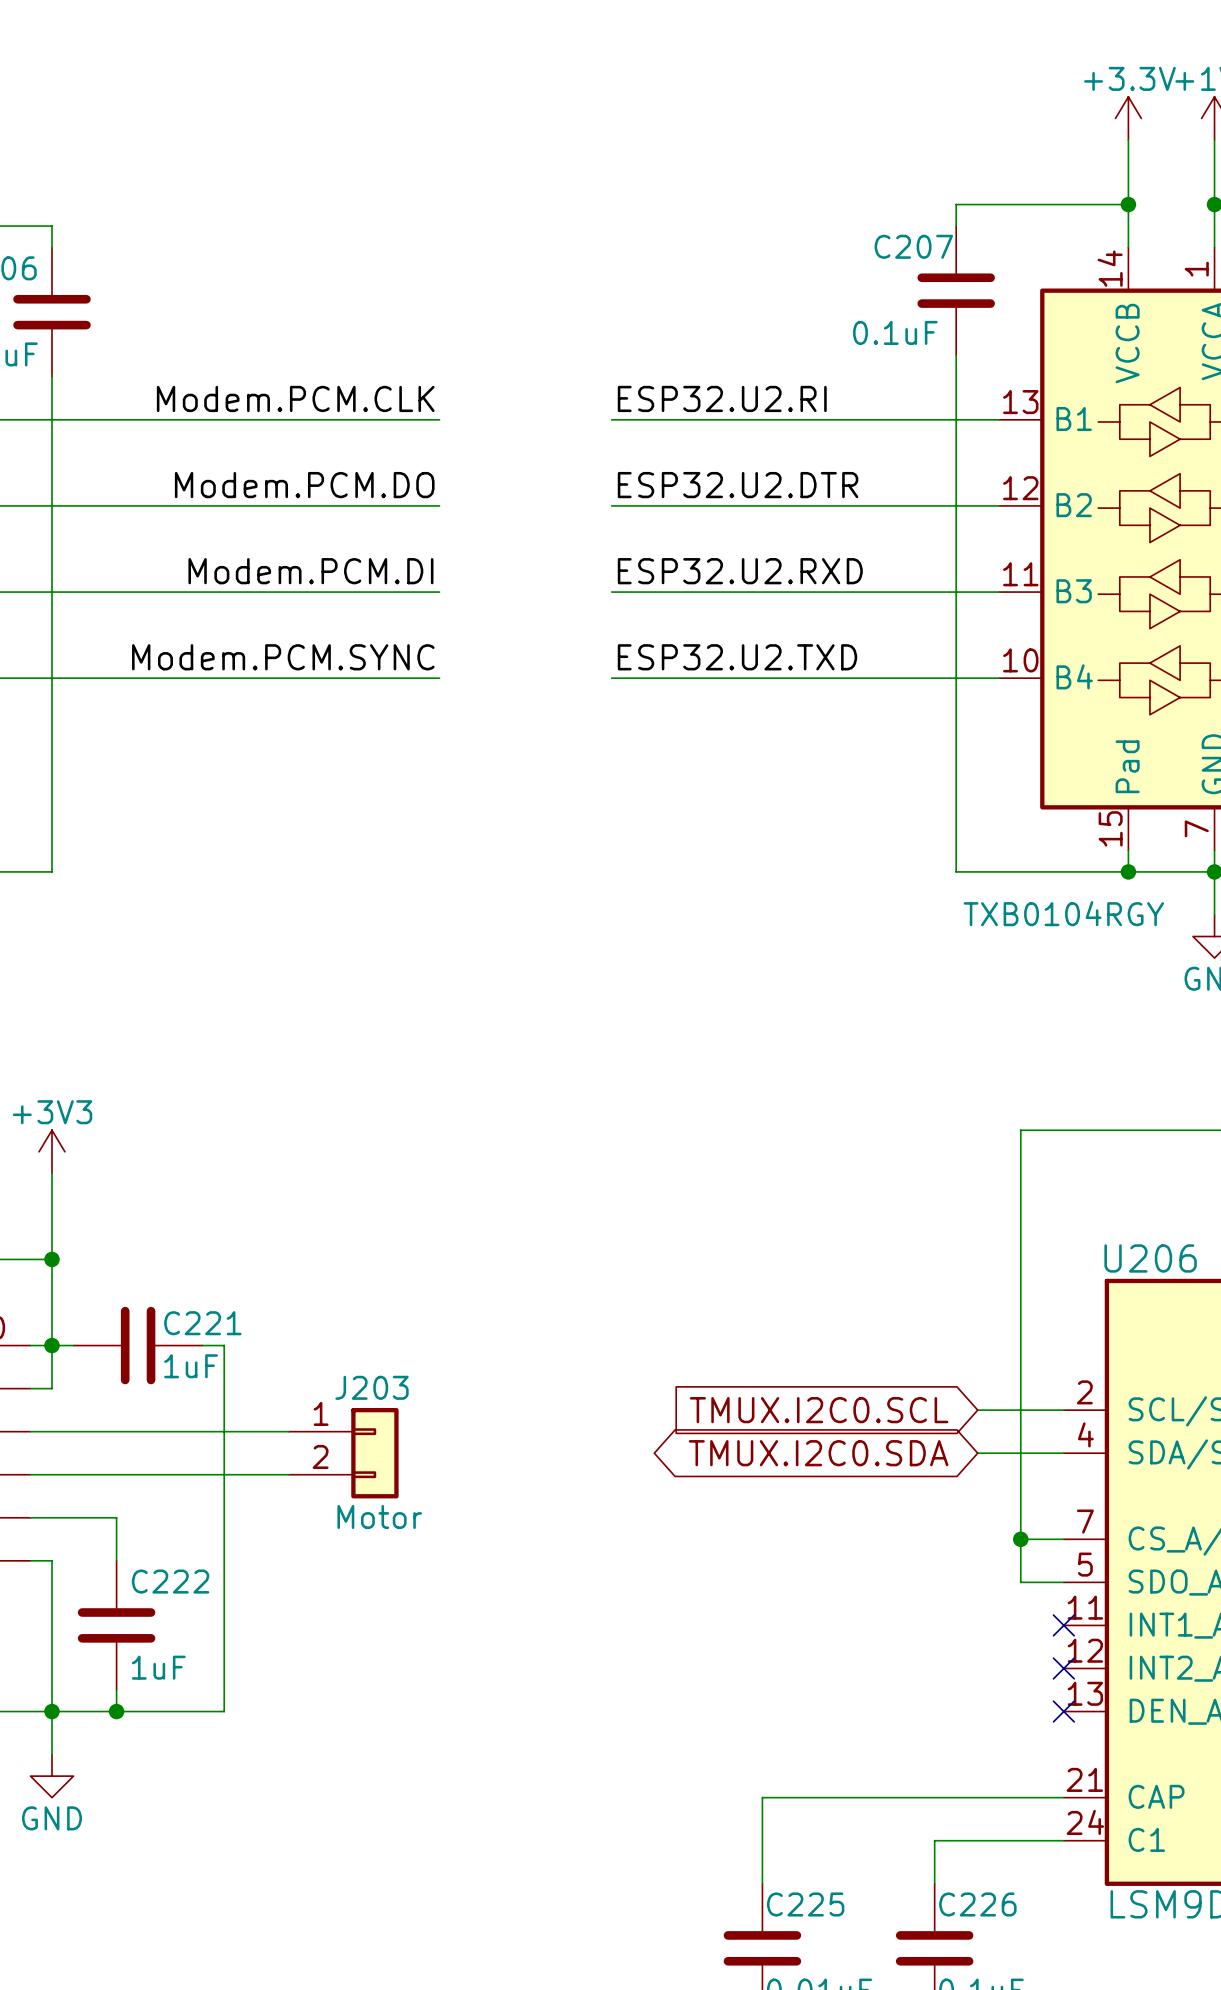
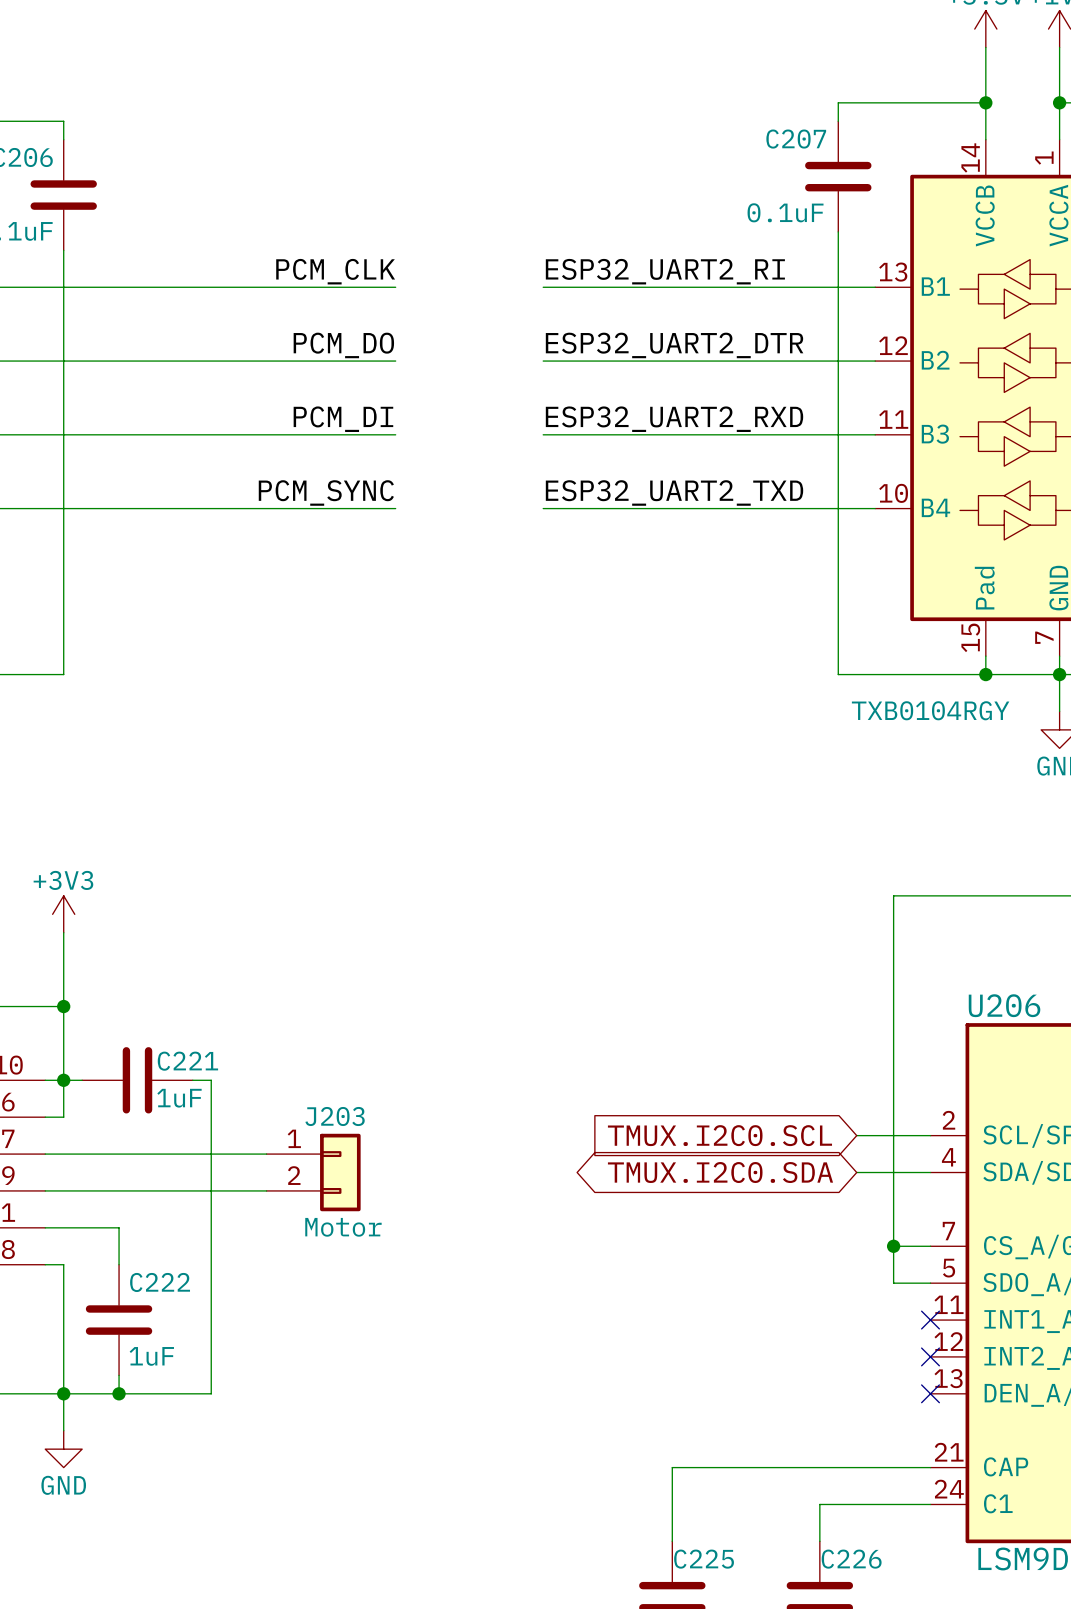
label: Modem.PCM.CLK (295, 398) -> PCM_CLK (335, 271)
label: ESP32.U2.RI (722, 398) -> ESP32_UART2_RI (665, 271)
label: Modem.PCM.DO (304, 485) -> PCM_DO (343, 345)
label: ESP32.U2.DTR (738, 485) -> ESP32_UART2_DTR (674, 345)
label: Modem.PCM.DI (310, 571) -> PCM_DI (343, 419)
label: ESP32.U2.RXD (740, 571) -> ESP32_UART2_RXD (674, 419)
label: Modem.PCM.SYNC (283, 657) -> PCM_SYNC (326, 492)
label: ESP32.U2.TXD (737, 657) -> ESP32_UART2_TXD (674, 492)

